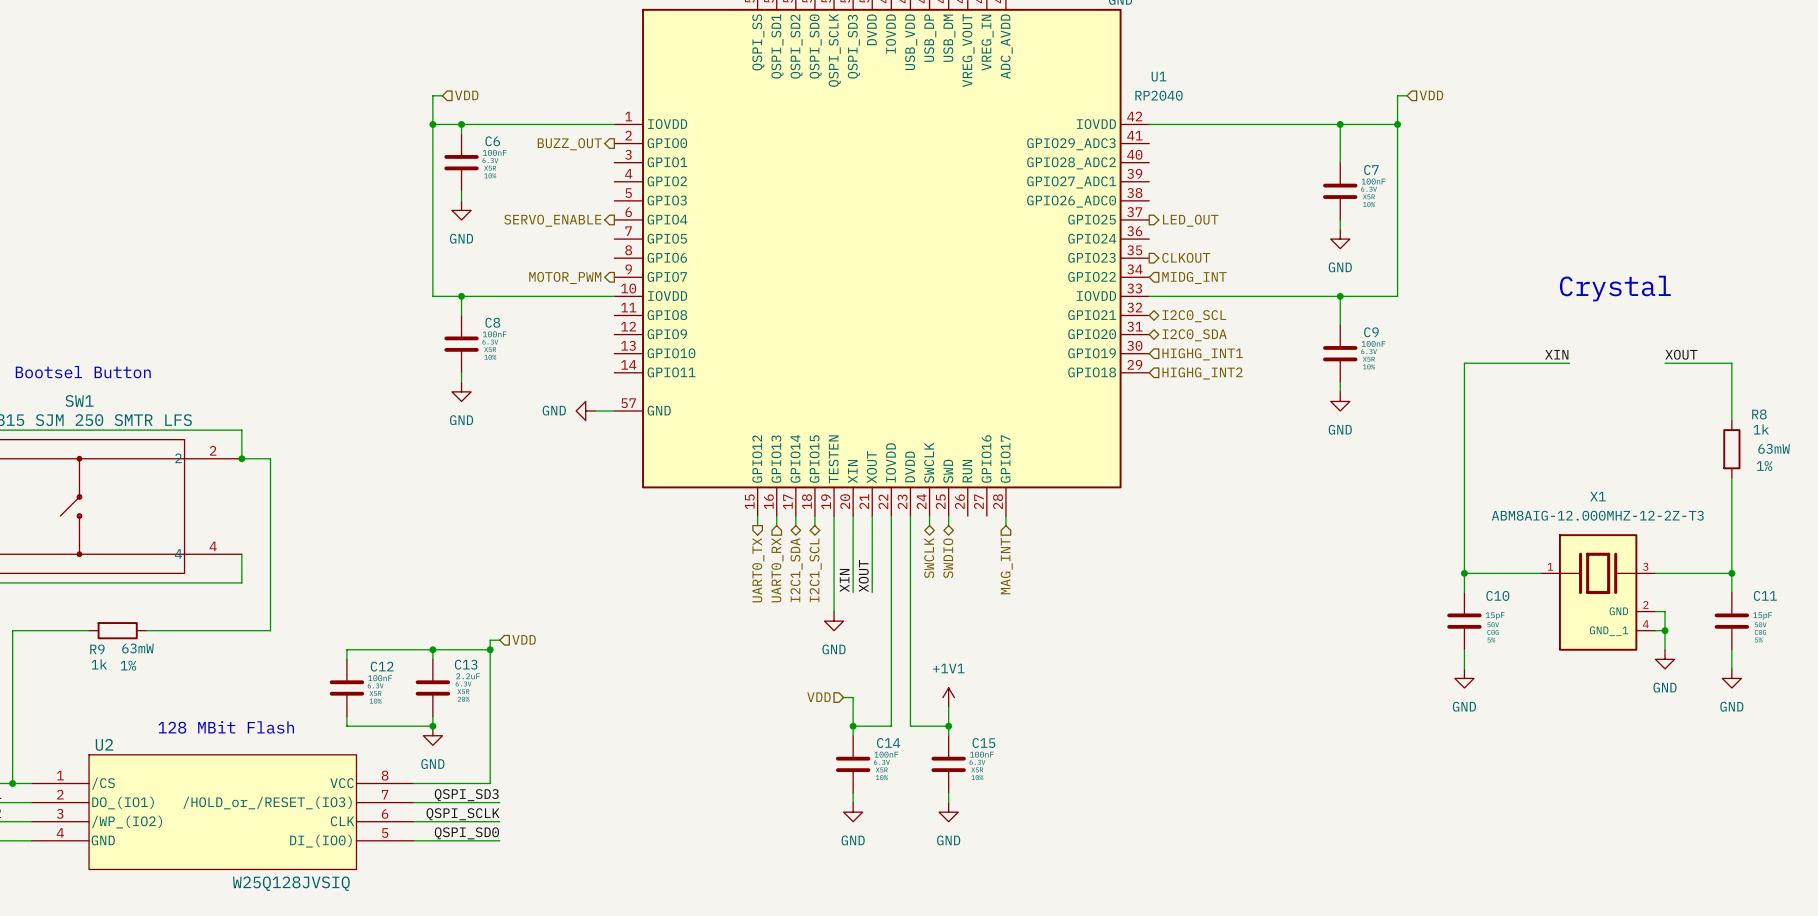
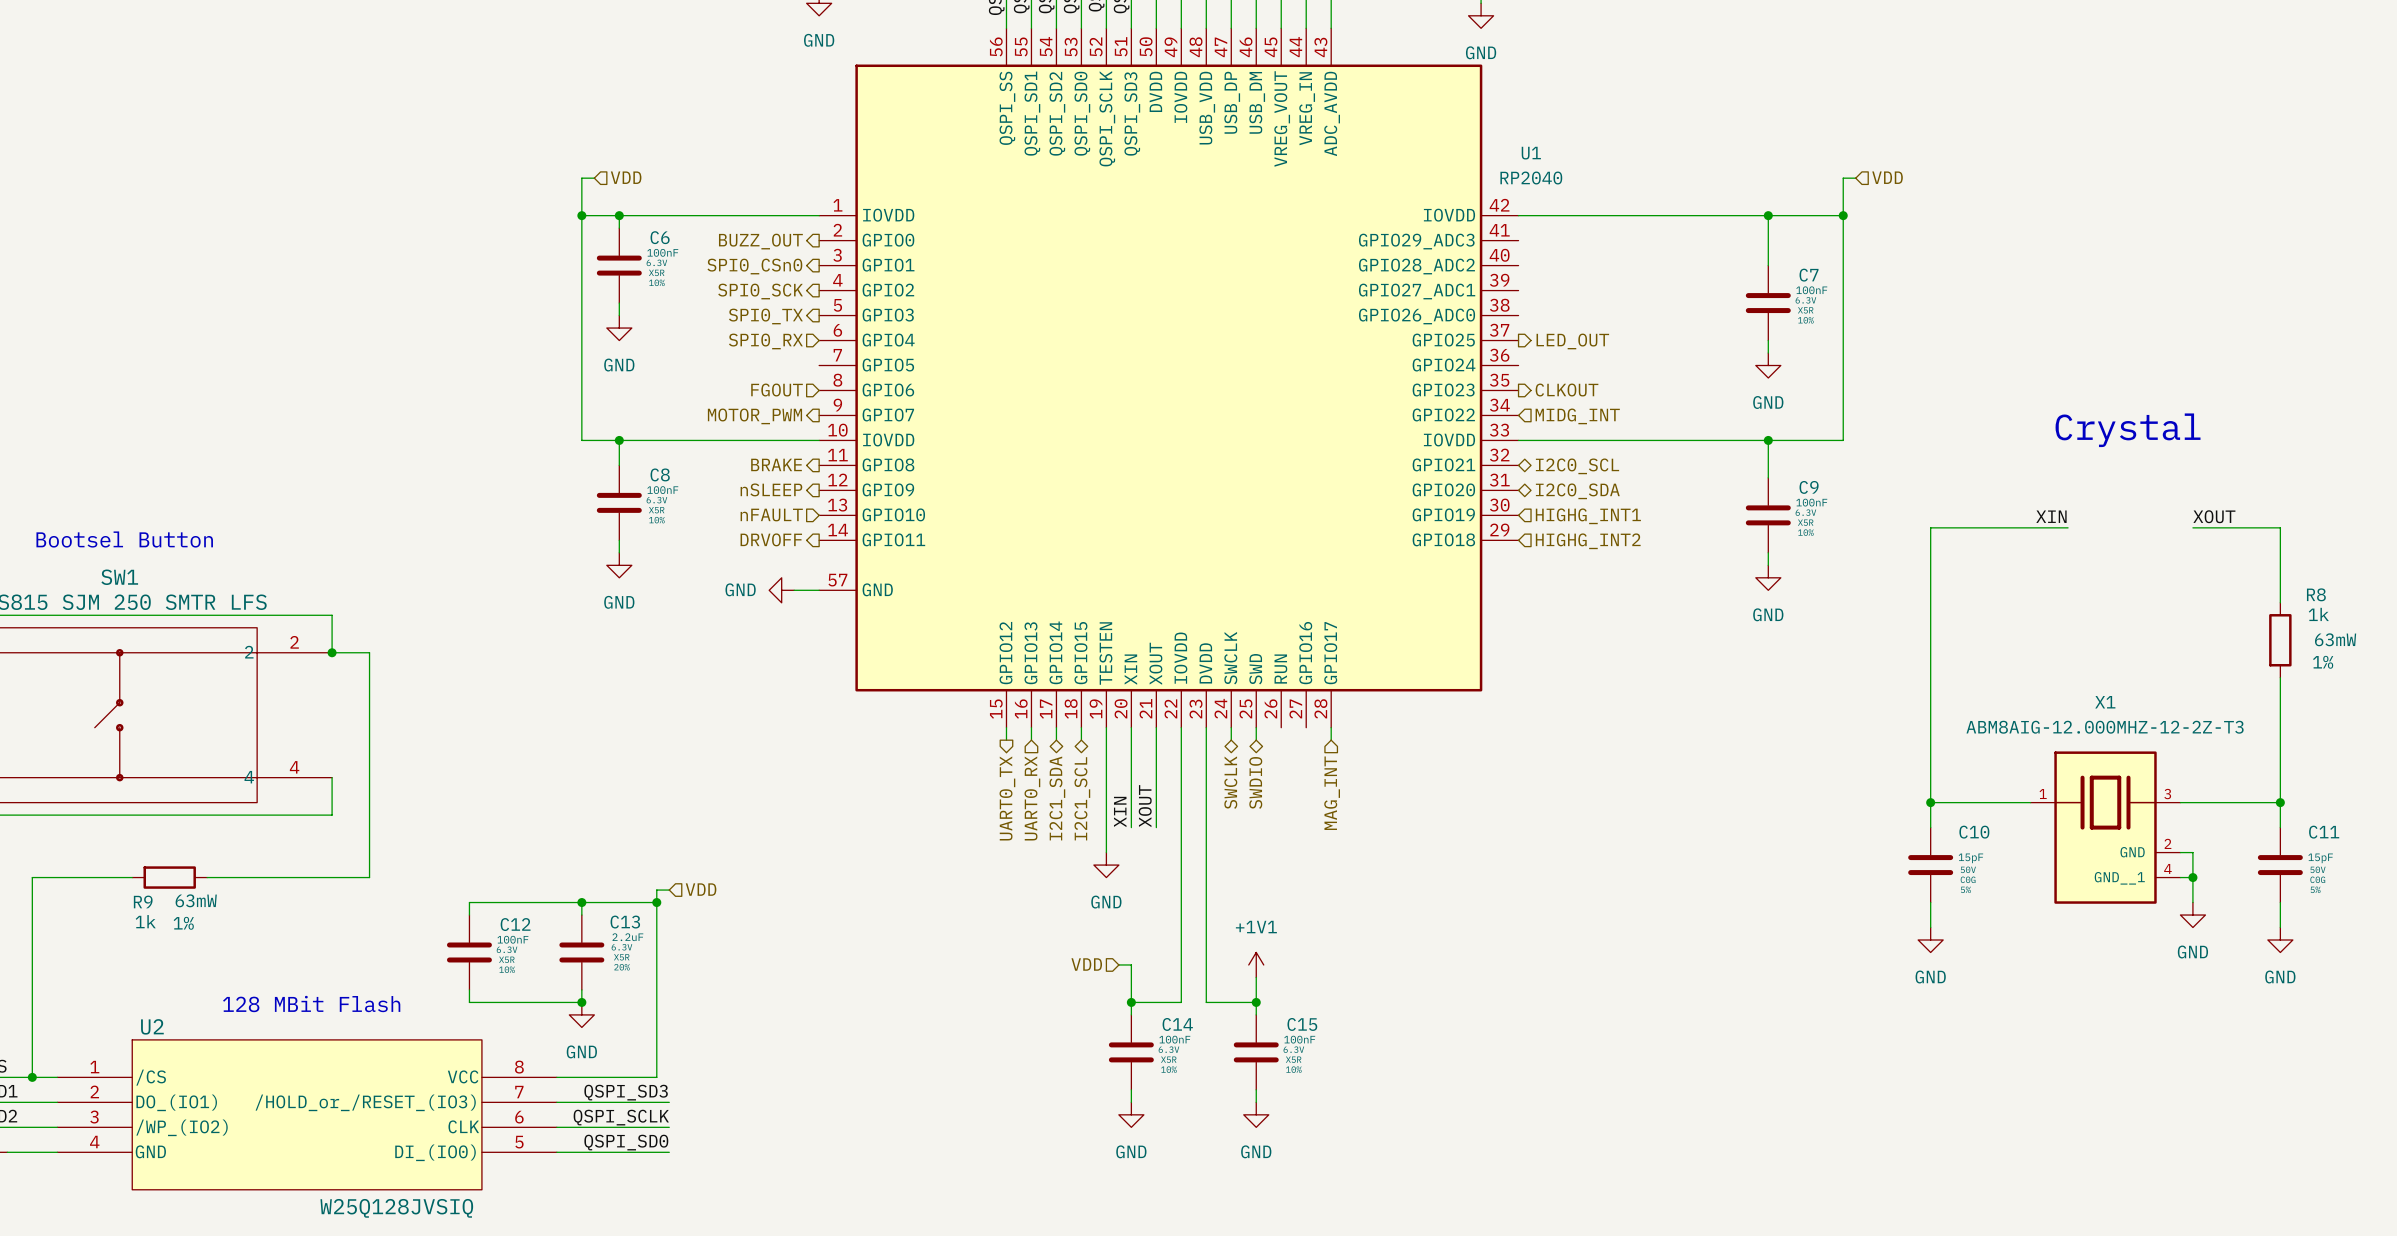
hierarchical label: none -> SPI0_CSn0 (754, 266)
hierarchical label: none -> SPI0_SCK (760, 291)
hierarchical label: none -> SPI0_TX (765, 316)
hierarchical label shape: output (552, 220) -> input (765, 341)
hierarchical label: SERVO_ENABLE (552, 220) -> SPI0_RX (765, 341)
hierarchical label: none -> FGOUT (777, 390)
hierarchical label: none -> BRAKE (776, 464)
hierarchical label: none -> nSLEEP (771, 489)
hierarchical label: none -> nFAULT (771, 515)
hierarchical label: none -> DRVOFF (771, 539)

